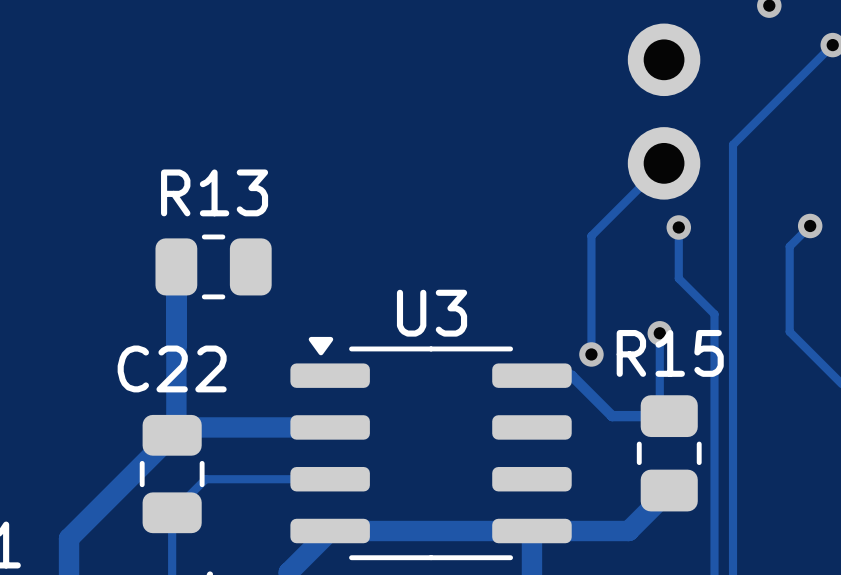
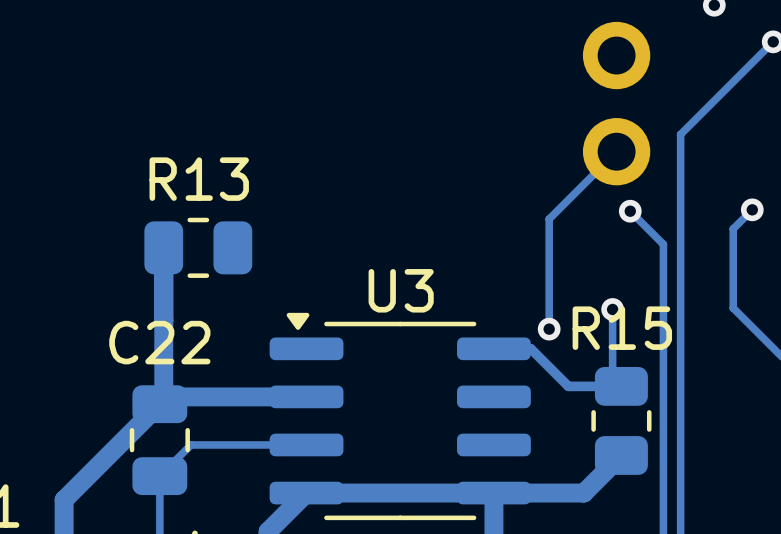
track: (678, 227) (678, 278) (714, 314) -> (630, 211) (663, 244) (663, 291)

